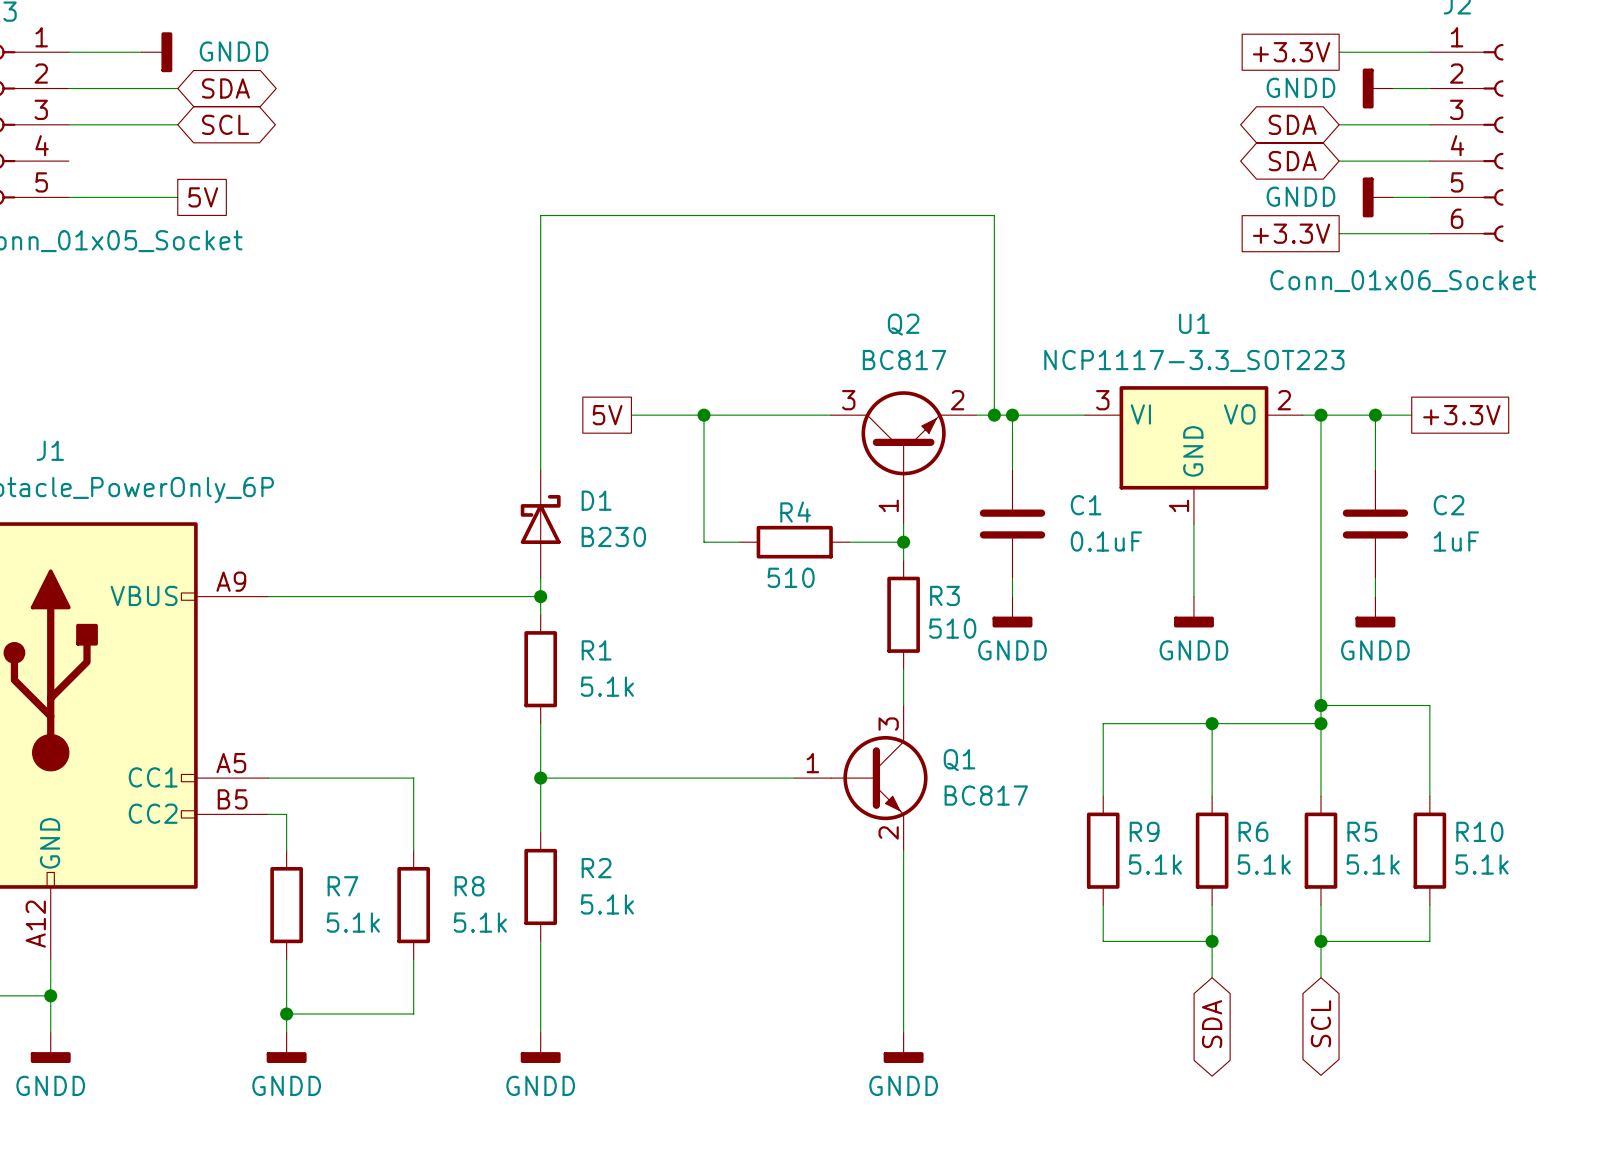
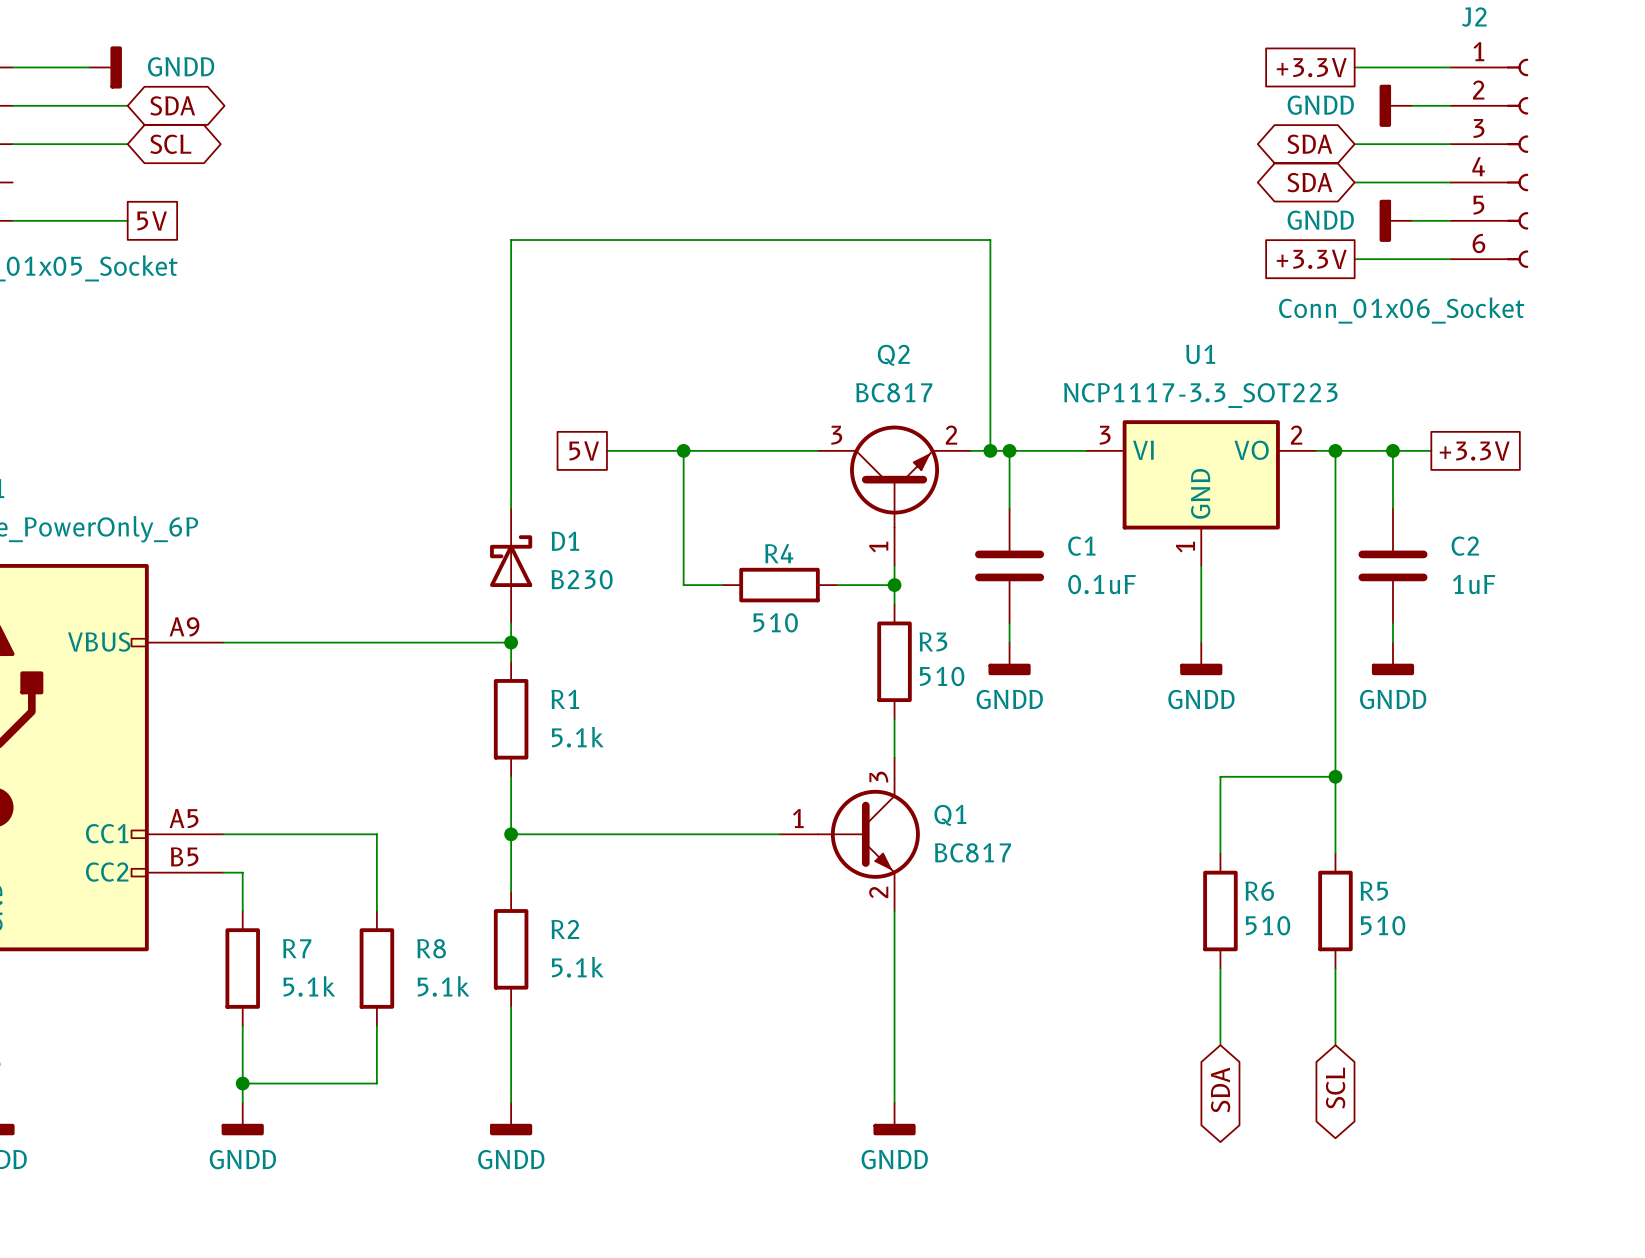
wire: (1320, 705) (1429, 705) (1429, 796) -> none
junction: (1320, 705) -> none
wire: (1212, 723) (1103, 723) (1103, 796) -> none
junction: (1212, 723) -> none
R9: 5.1k (1103, 850) -> none
R10: 5.1k (1429, 850) -> none
R6 value: 5.1k (1264, 864) -> 510 (1268, 925)
R5 value: 5.1k (1373, 864) -> 510 (1383, 925)
wire: (1103, 905) (1103, 941) (1212, 941) -> none
wire: (1429, 905) (1429, 941) (1320, 941) -> none
junction: (1212, 941) -> none
junction: (1320, 941) -> none

